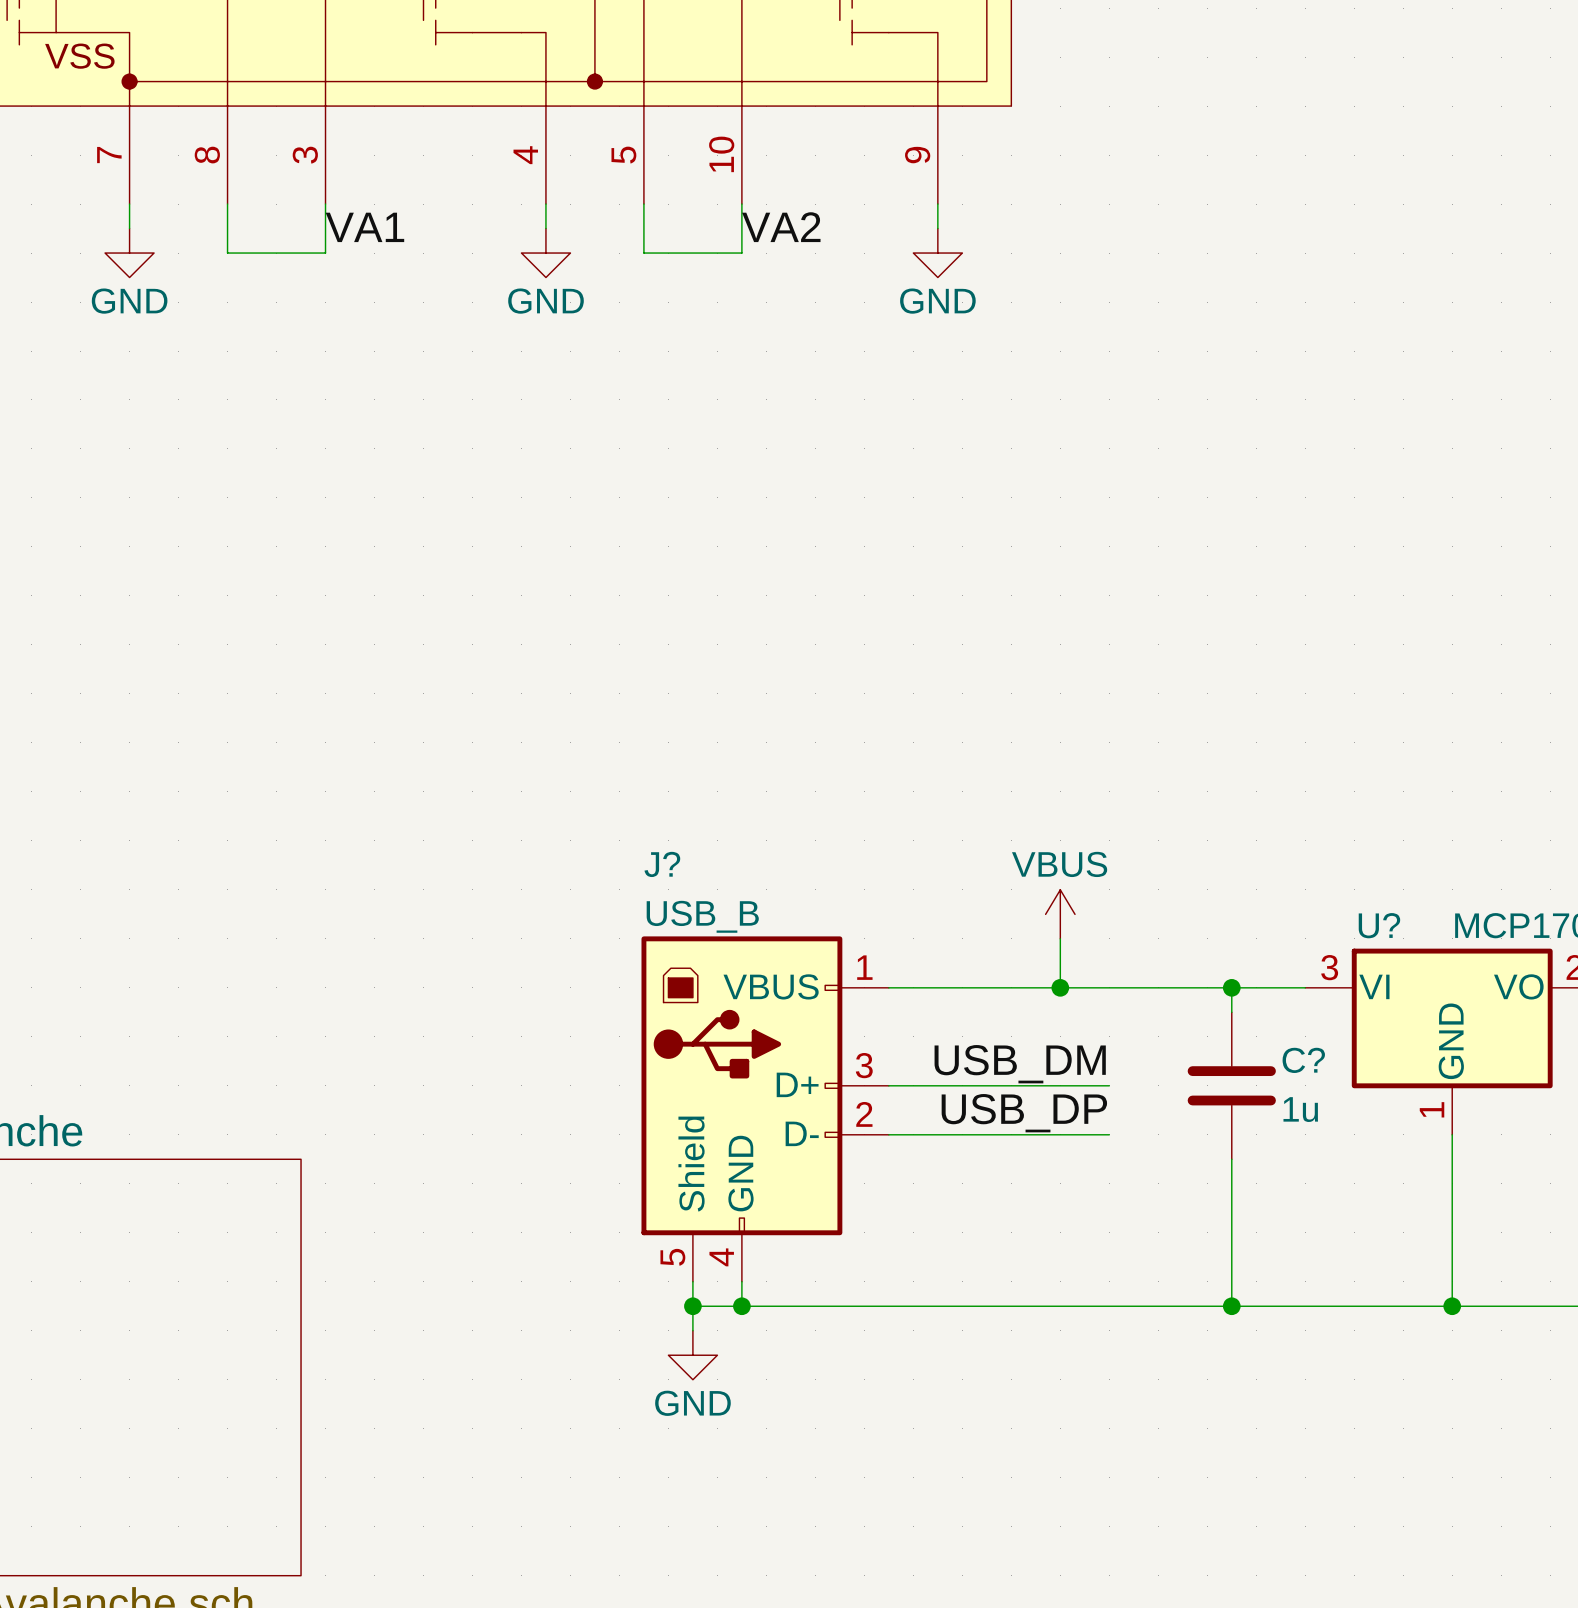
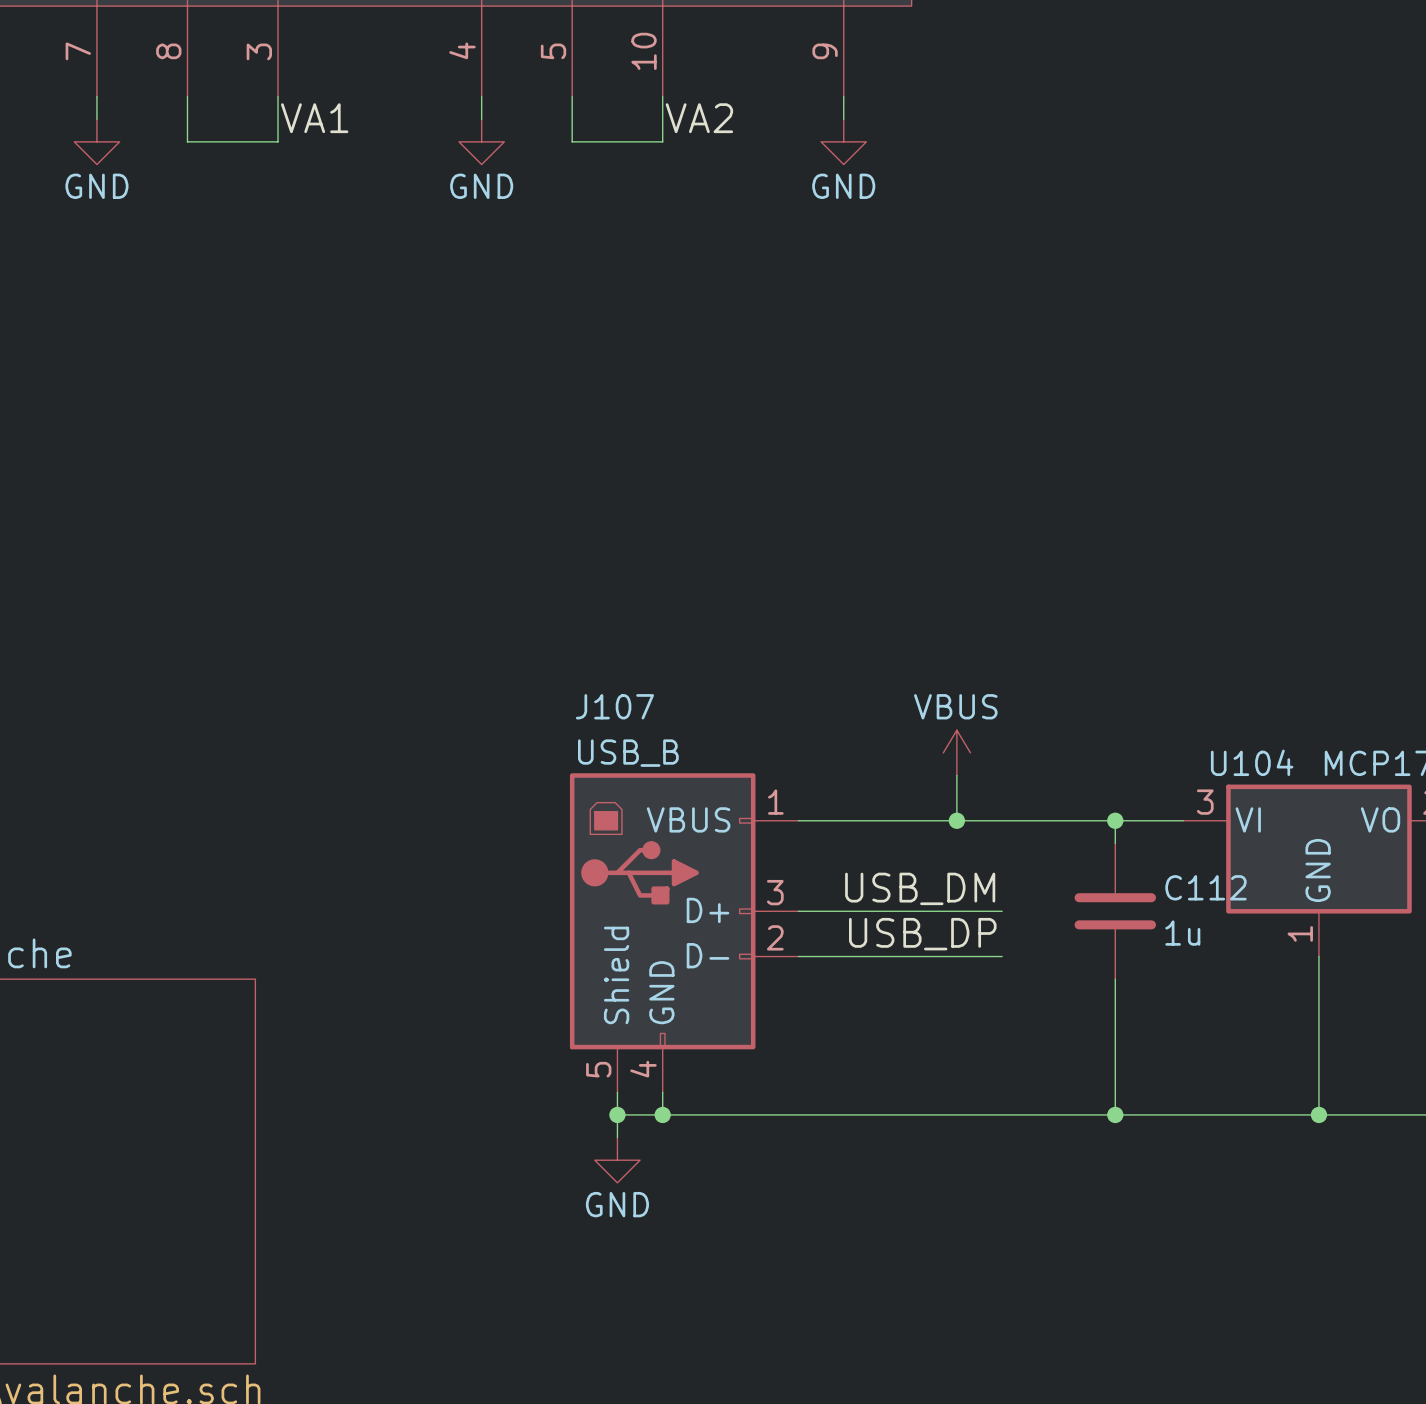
J? name: J? (662, 864) -> J107 (614, 706)
U? name: U? (1379, 925) -> U104 (1252, 762)
C? name: C? (1303, 1060) -> C112 (1205, 887)

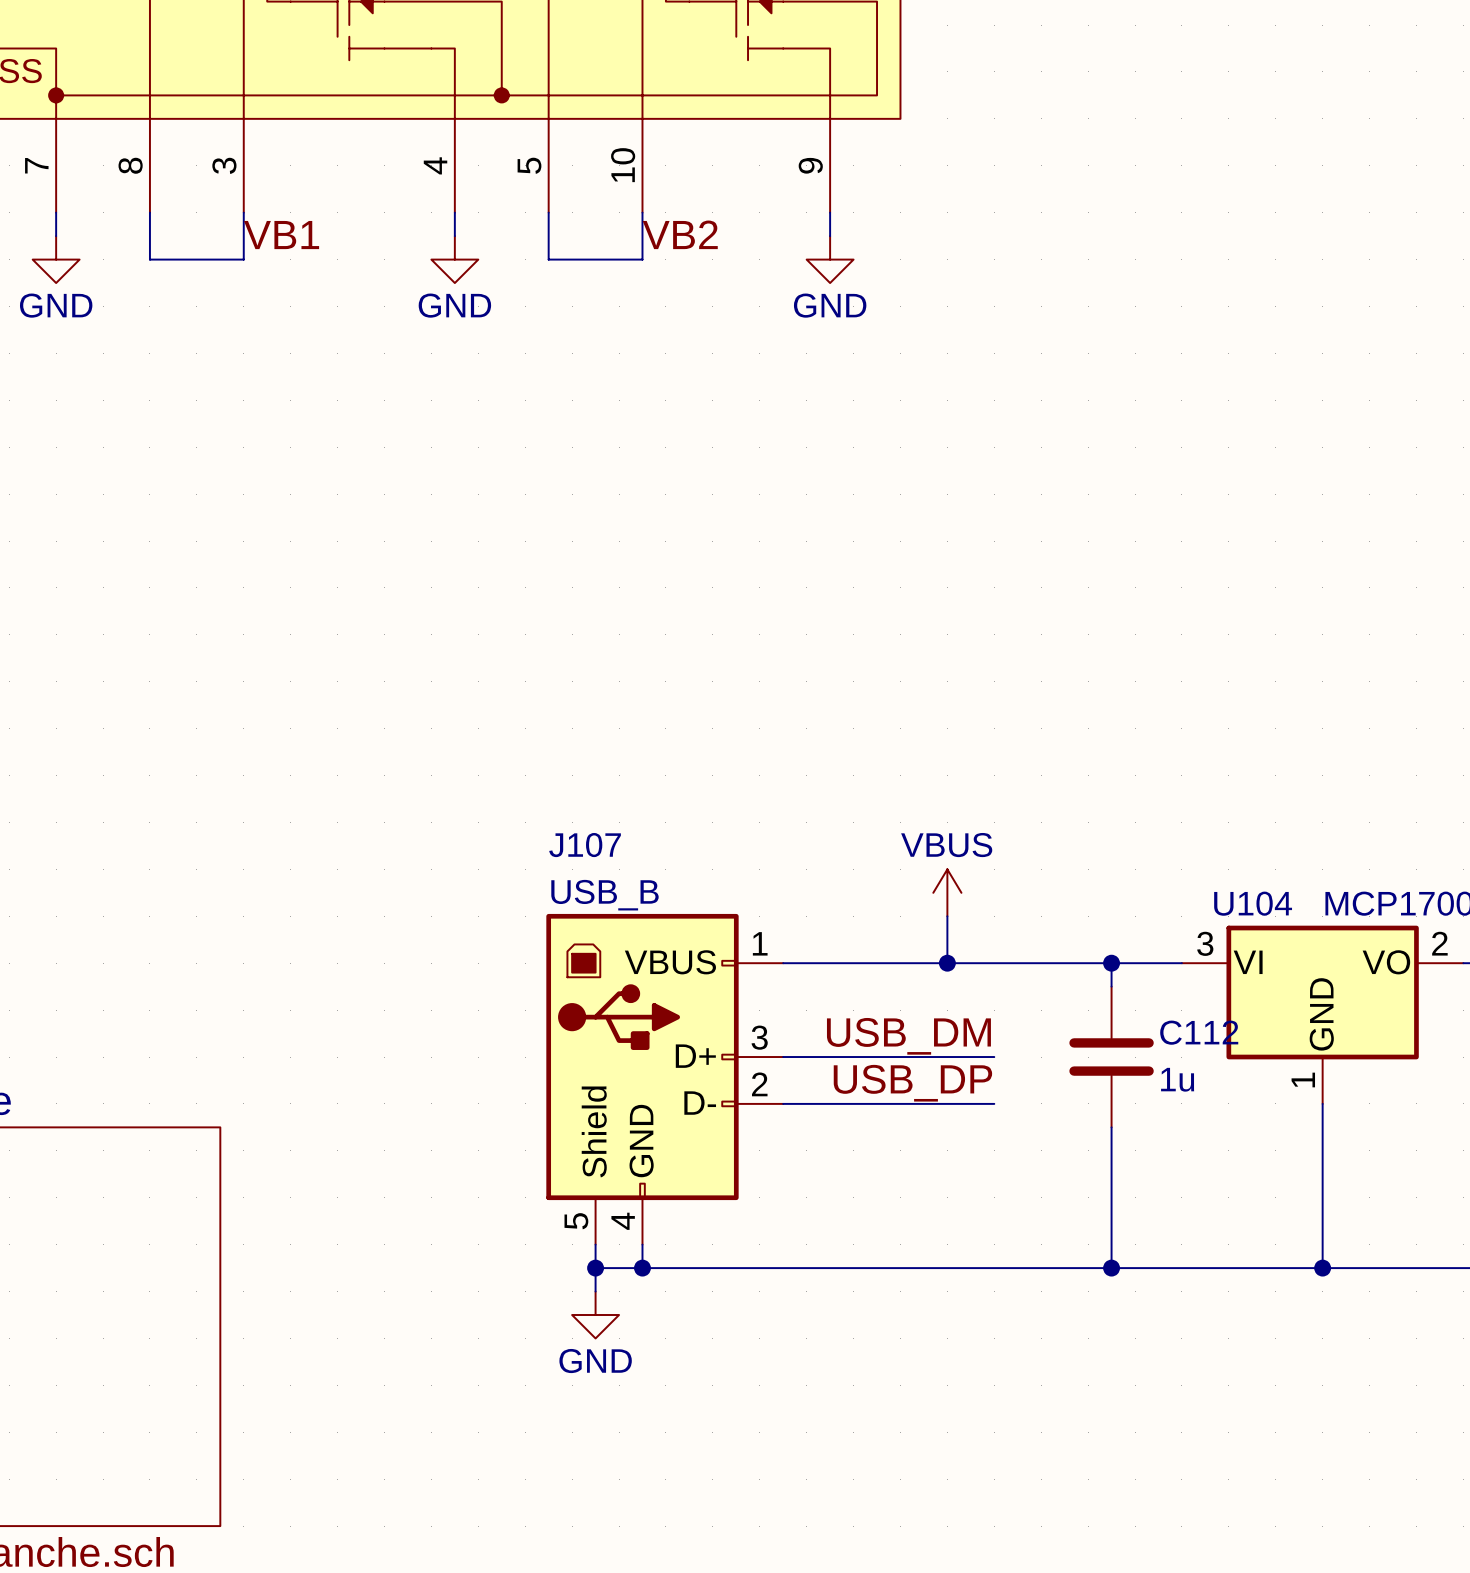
label: VA1 (314, 118) -> VB1 (281, 235)
label: VA2 (699, 118) -> VB2 (680, 234)

